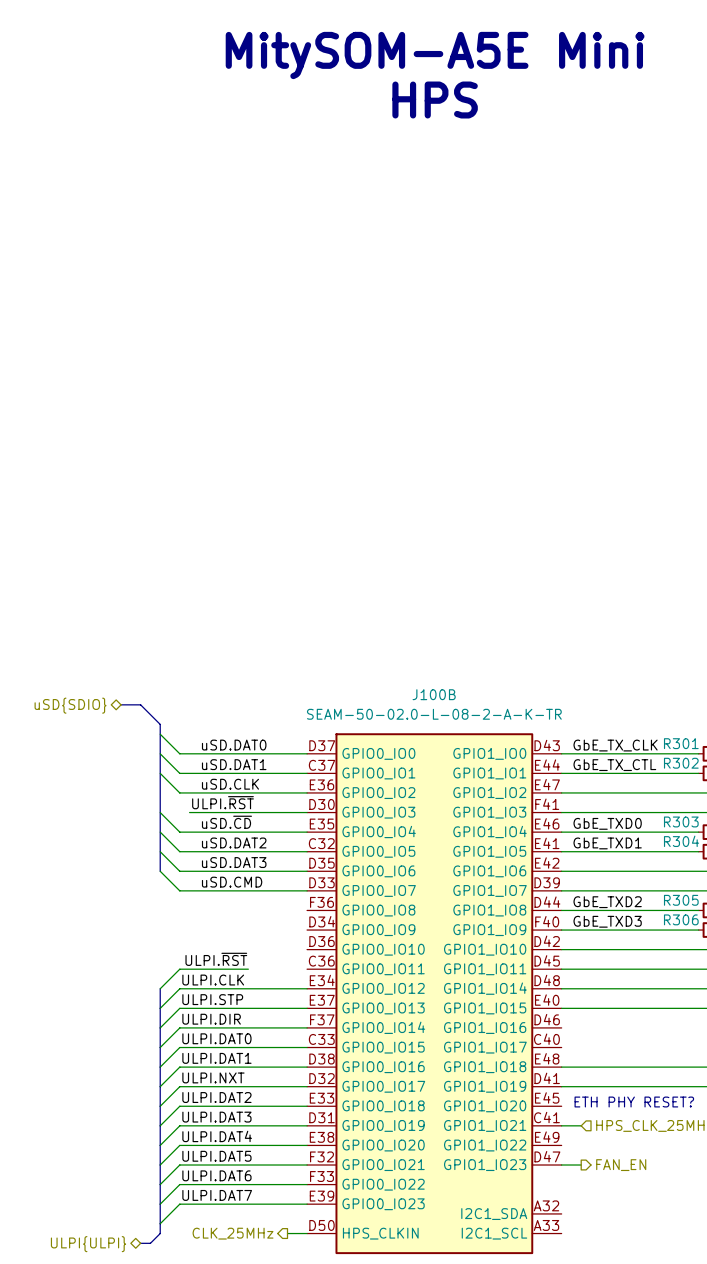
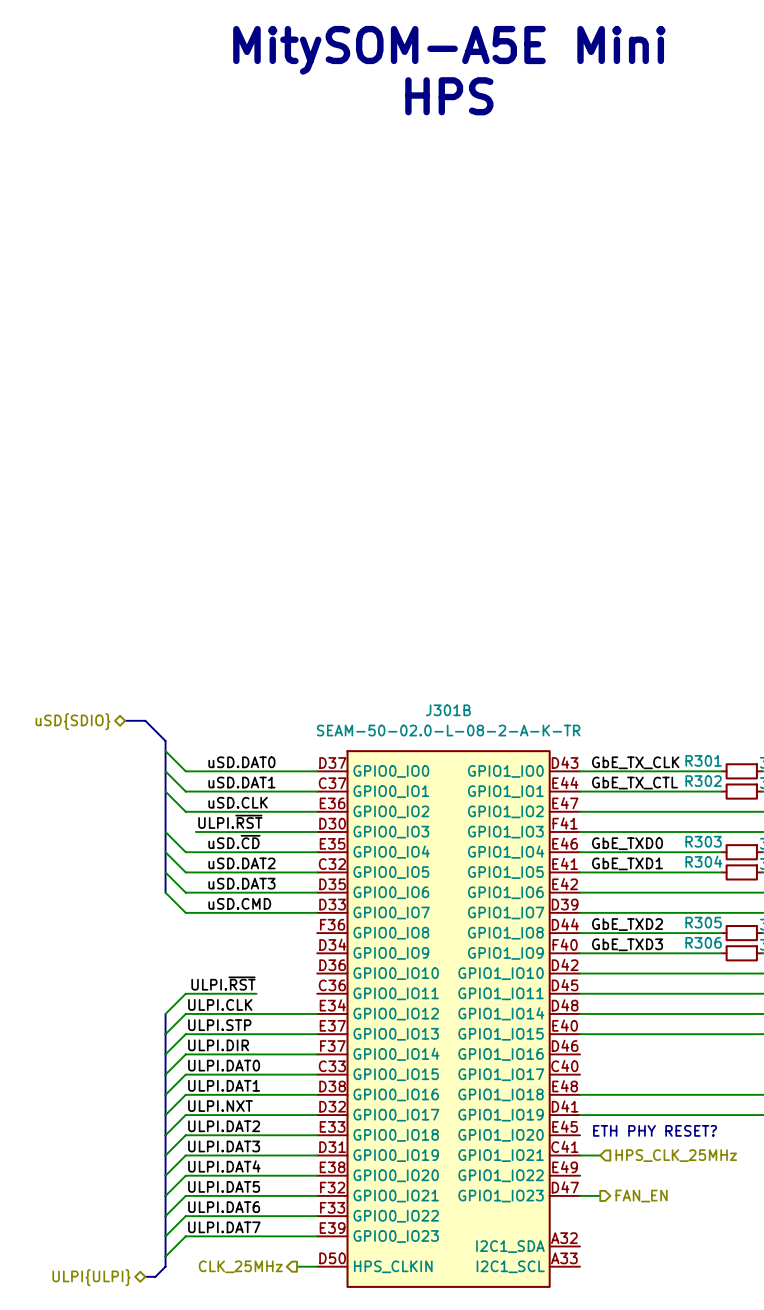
J100B name: J100B (434, 694) -> J301B (448, 710)

